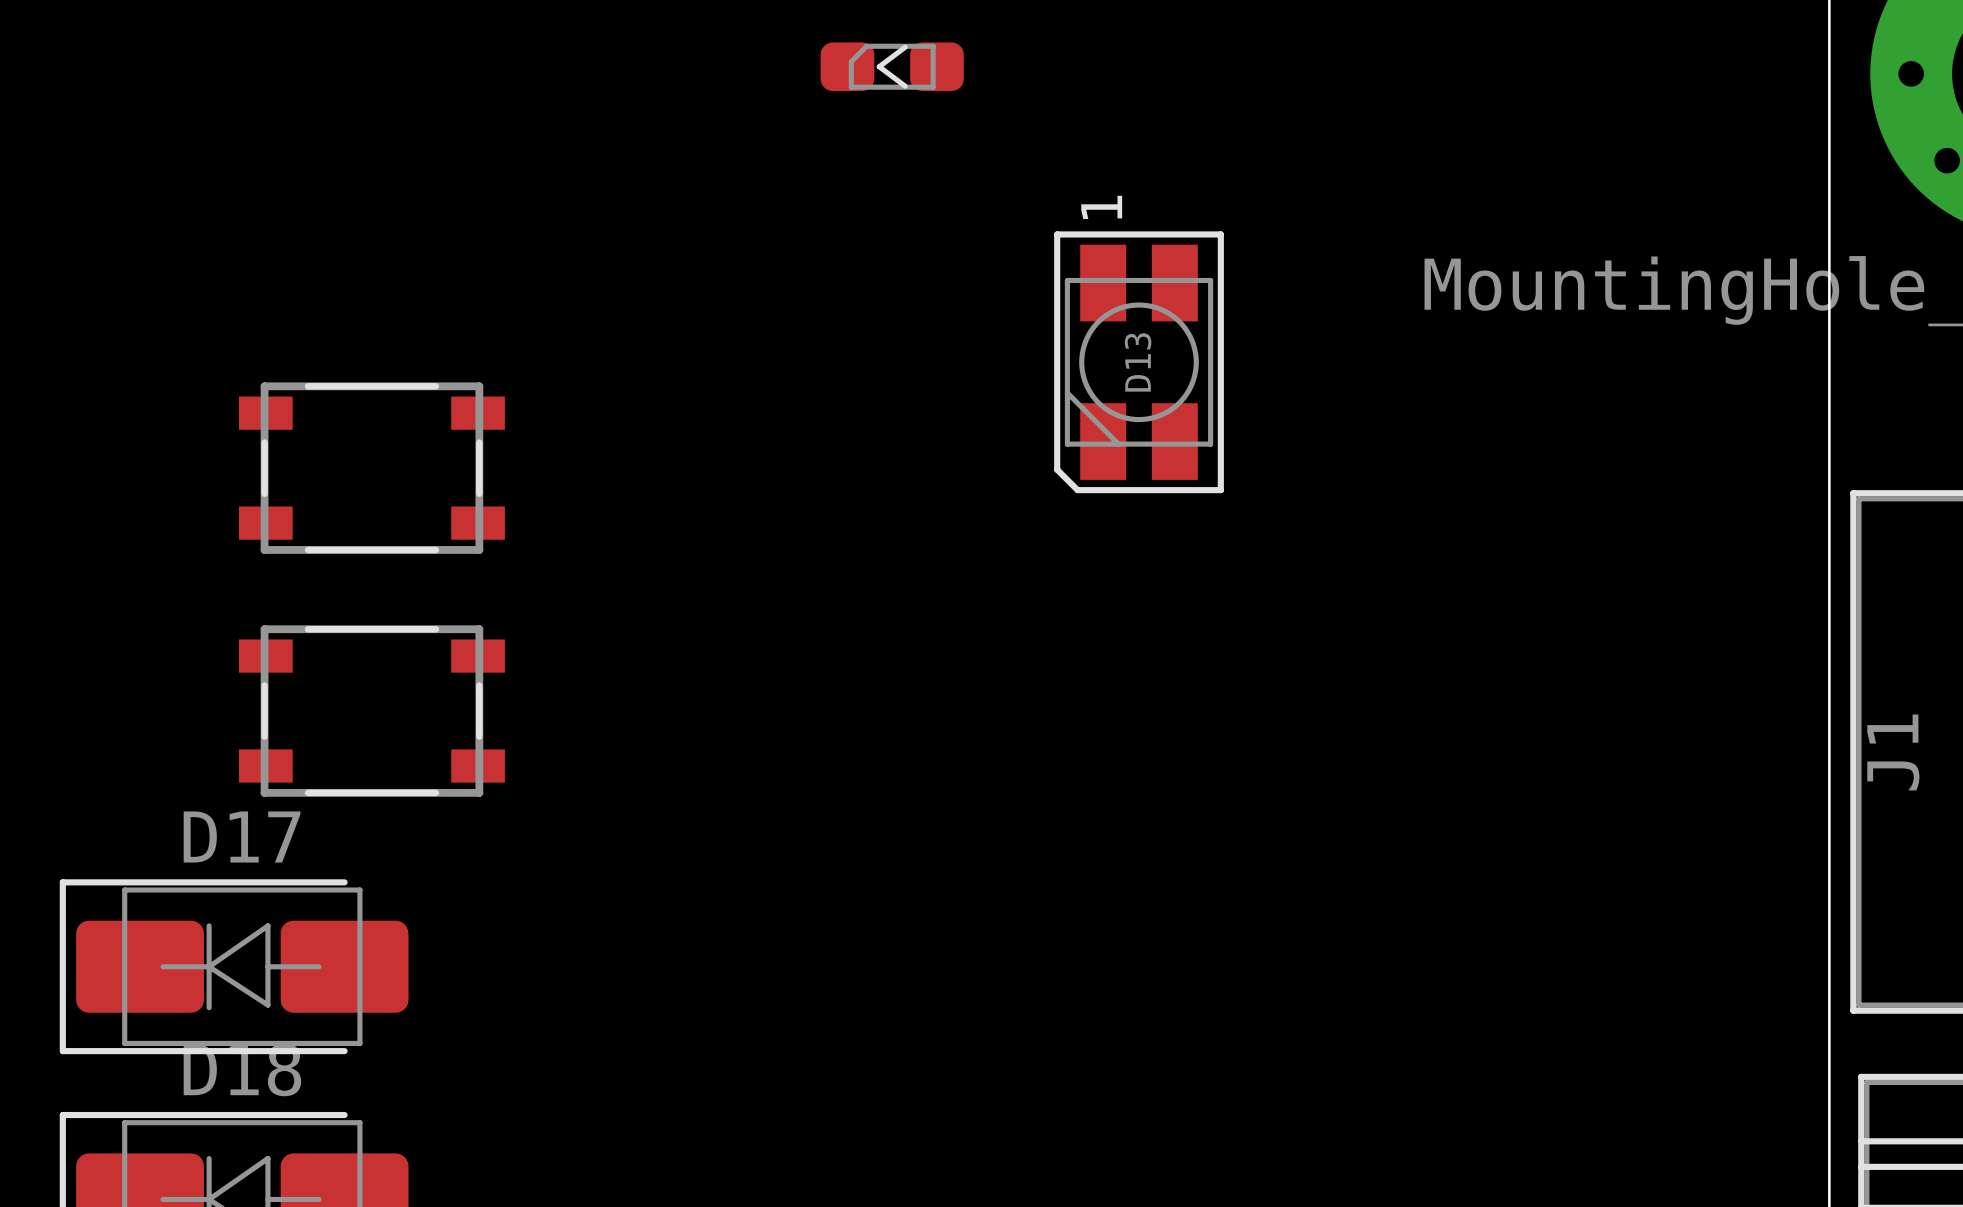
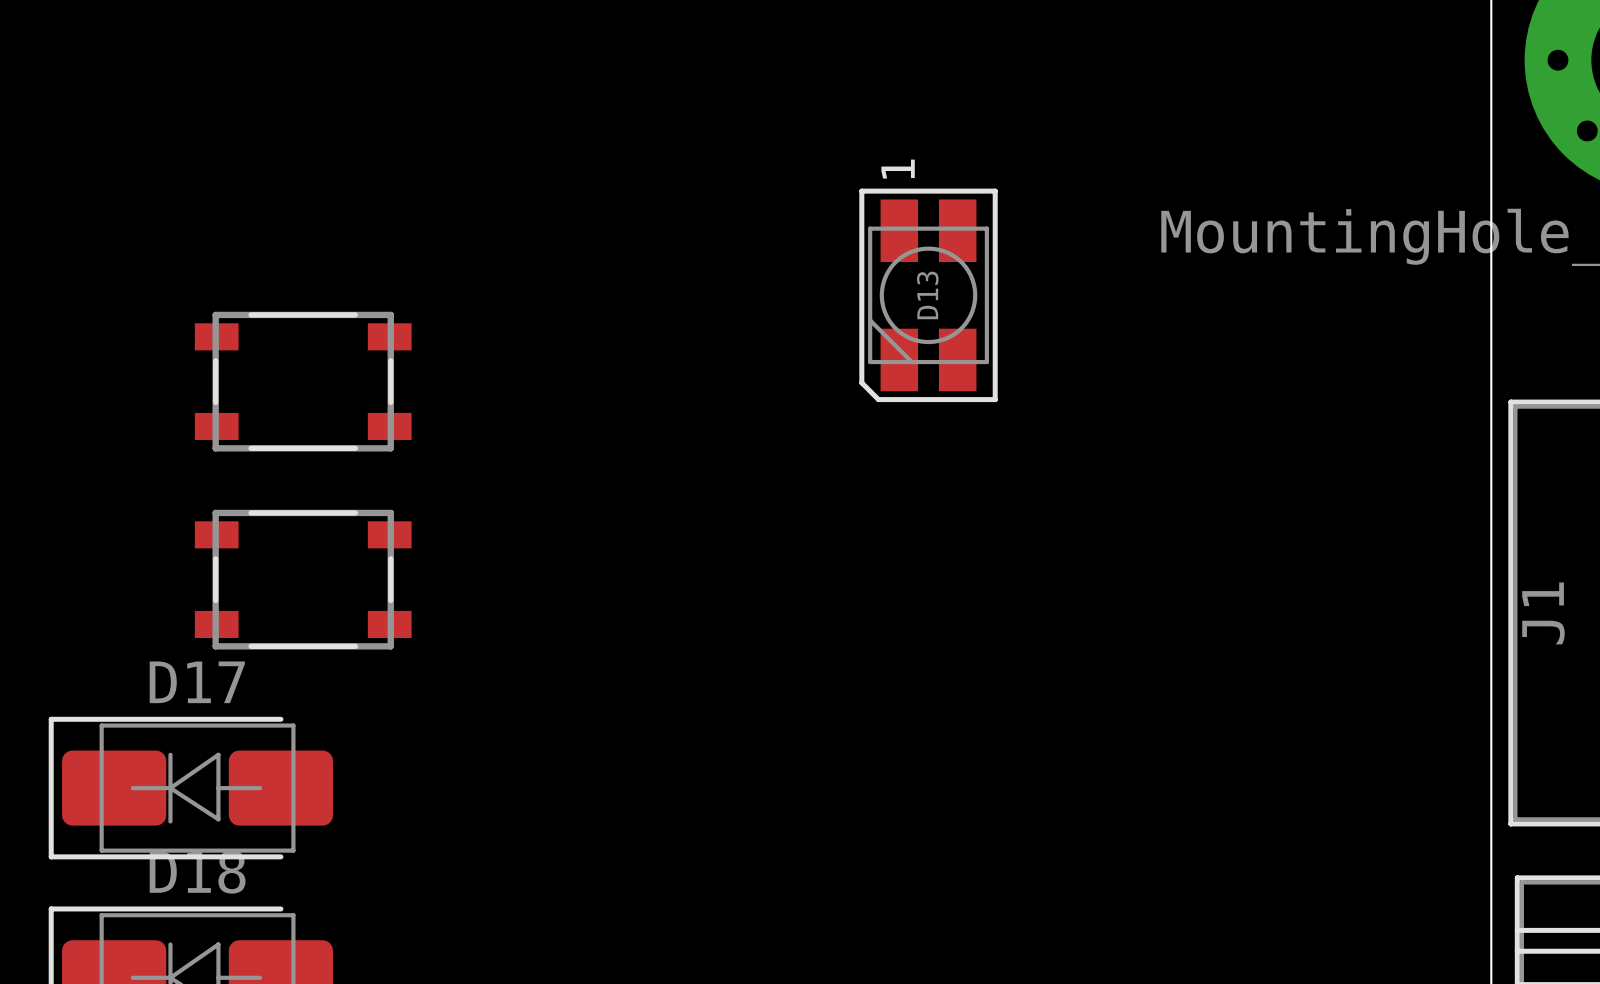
part: (892, 66) -> none

